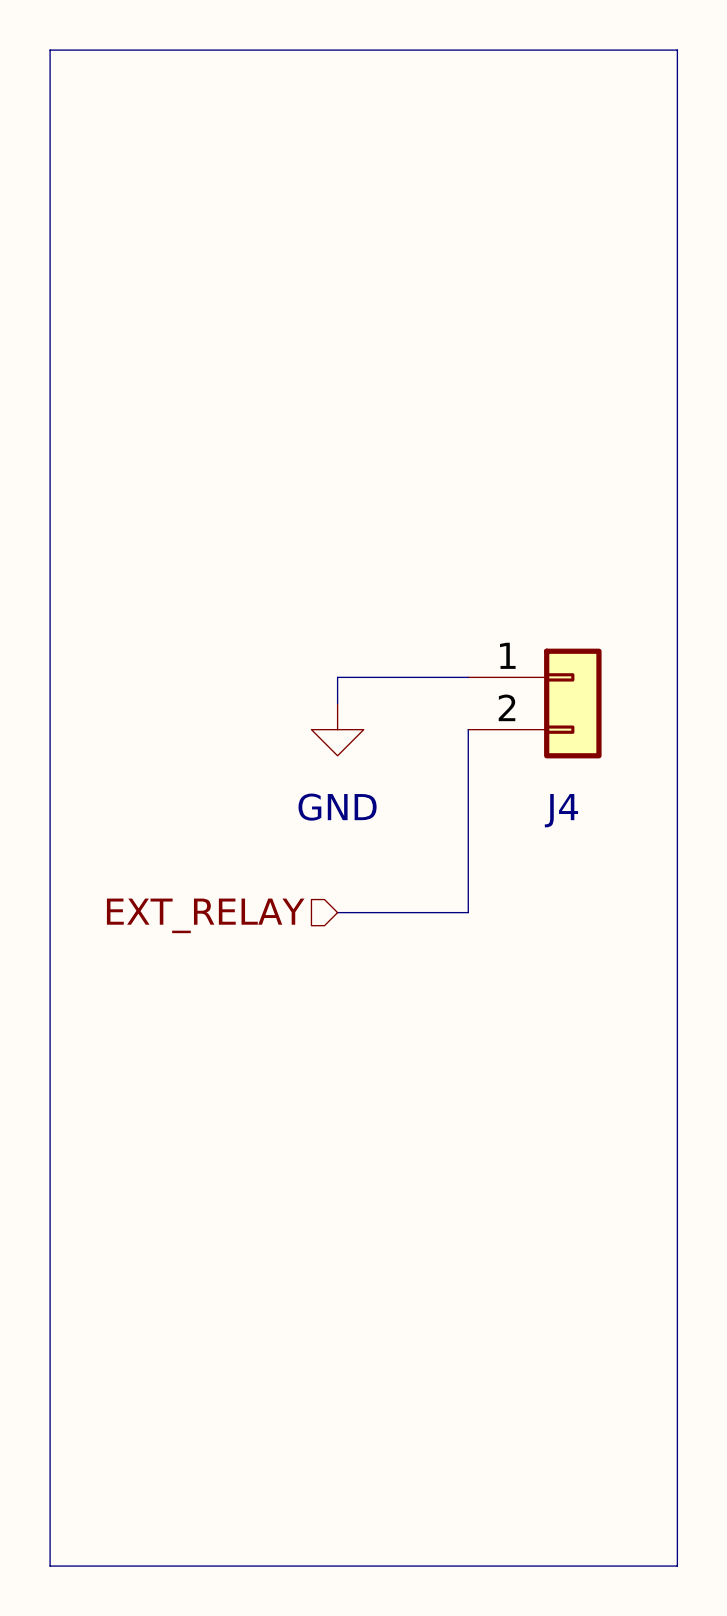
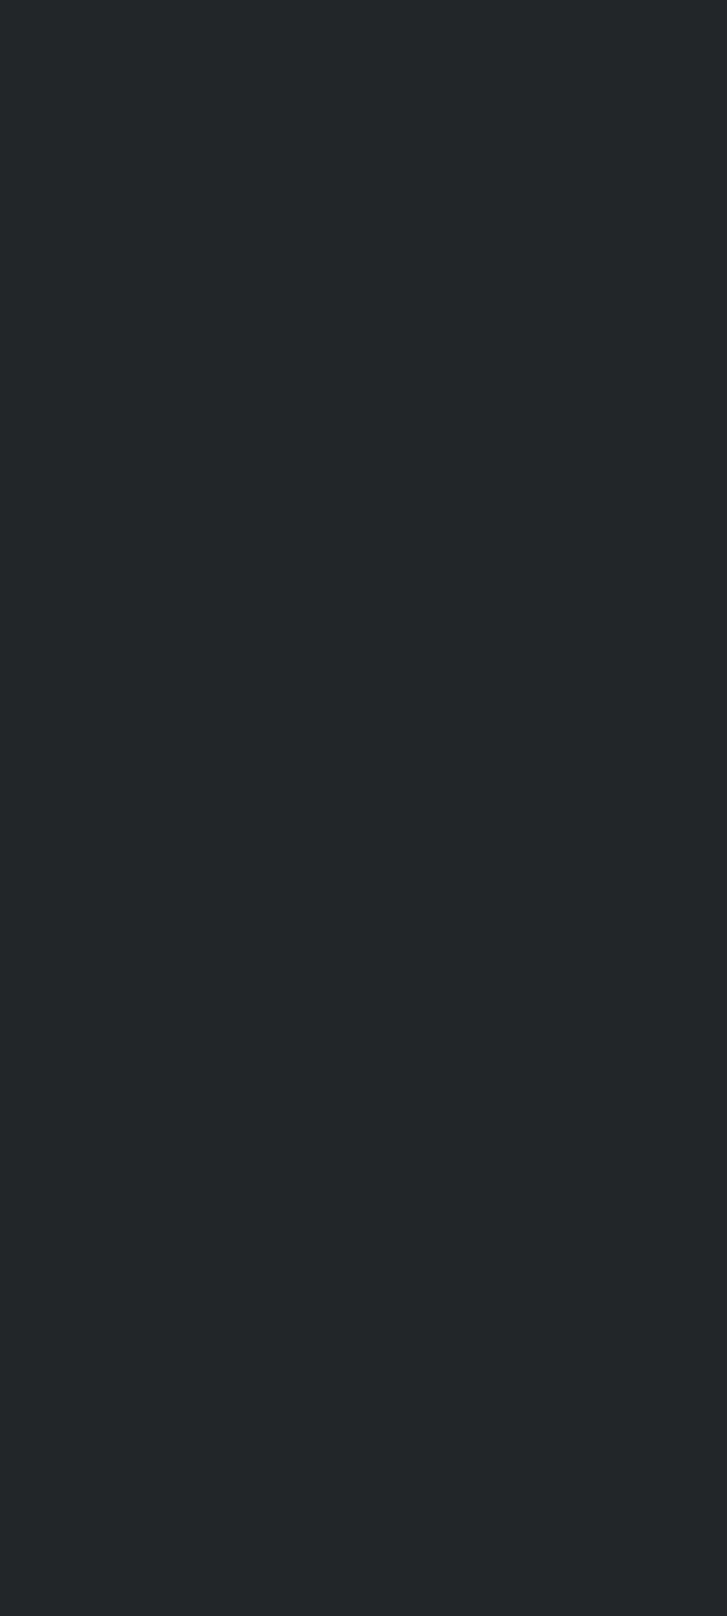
line: (50, 50) (677, 50) (677, 1566) (50, 1566) (50, 50) -> none
wire: (468, 677) (337, 677) (337, 703) -> none
J4: (534, 703) -> none
power symbol: GND (337, 729) -> none
wire: (468, 729) (468, 912) (337, 912) -> none
hierarchical label: EXT_RELAY (205, 915) -> none

